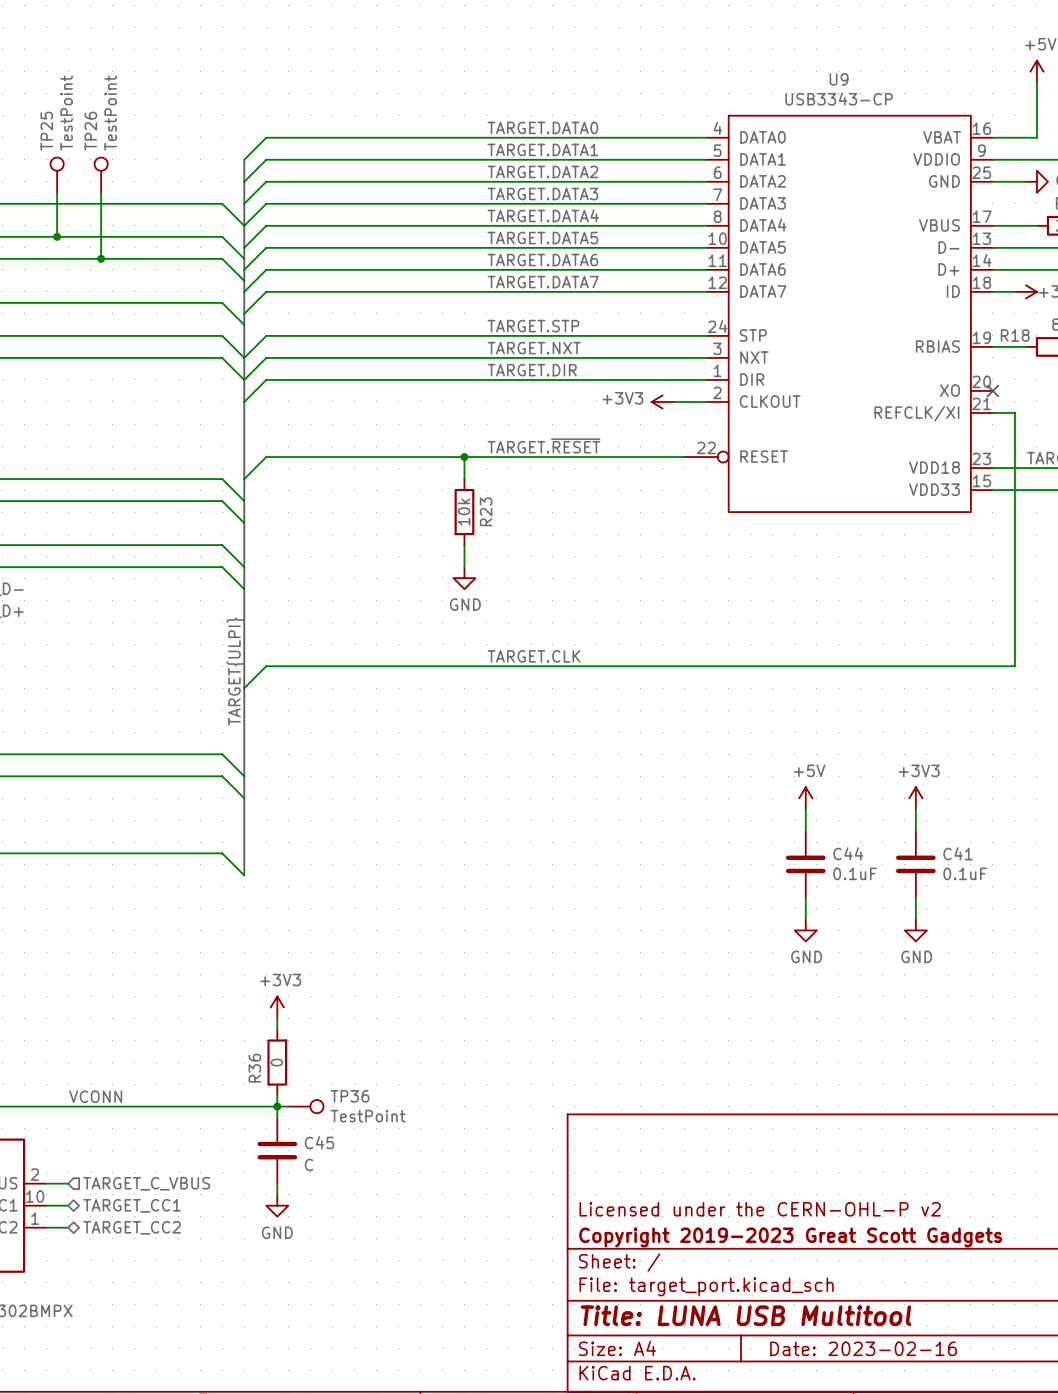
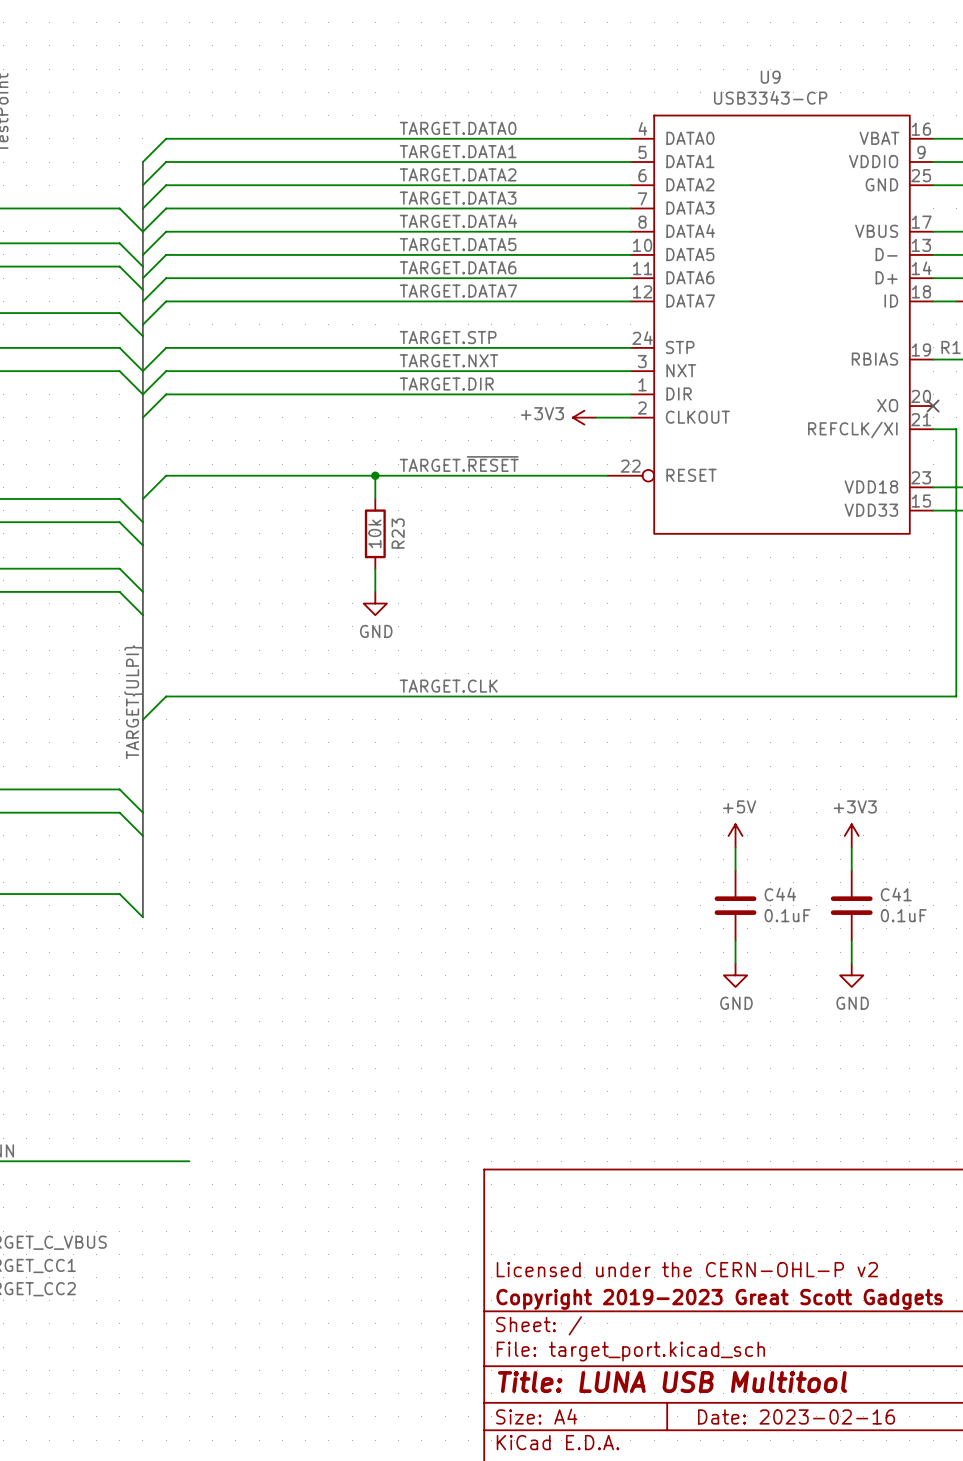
power symbol: +3V3 (277, 1007) -> none
wire: (277, 1018) (277, 1029) -> none
R36: 0 (277, 1062) -> none
wire: (277, 1095) (277, 1117) -> none
junction: (277, 1106) -> none
TP36: TestPoint (305, 1106) -> none
C45: C (277, 1150) -> none
wire: (277, 1183) (277, 1194) -> none
power symbol: GND (277, 1205) -> none

